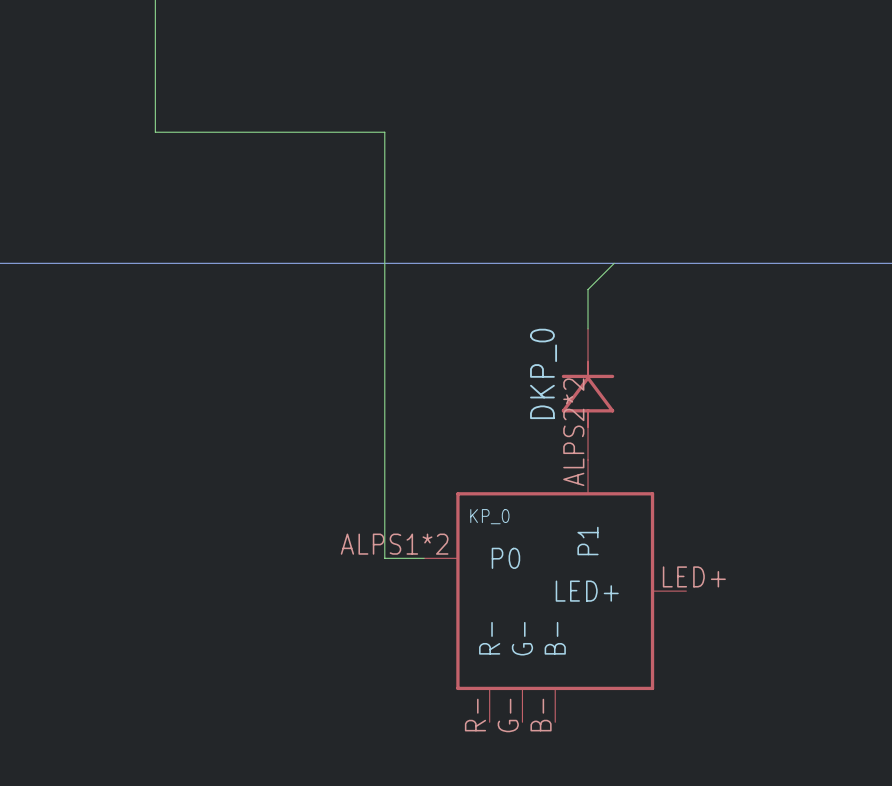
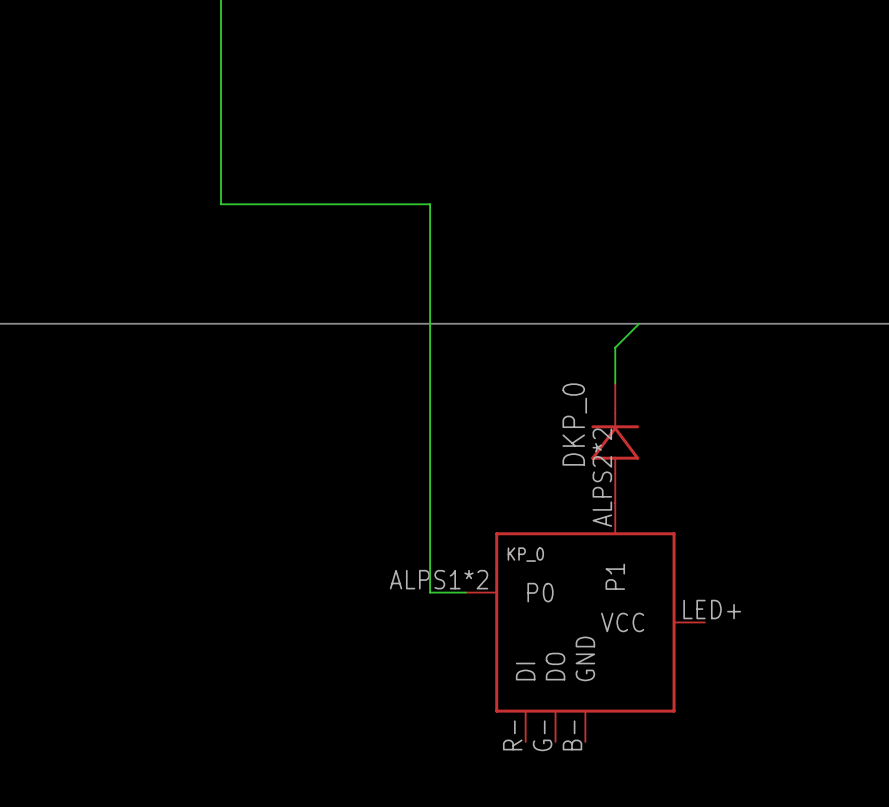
KP_0 pin name: LED+ (587, 591) -> VCC (622, 622)
KP_0 pin name: R- (489, 638) -> DI (525, 671)
KP_0 pin name: G- (522, 638) -> DO (555, 666)
KP_0 pin name: B- (555, 638) -> GND (585, 658)

